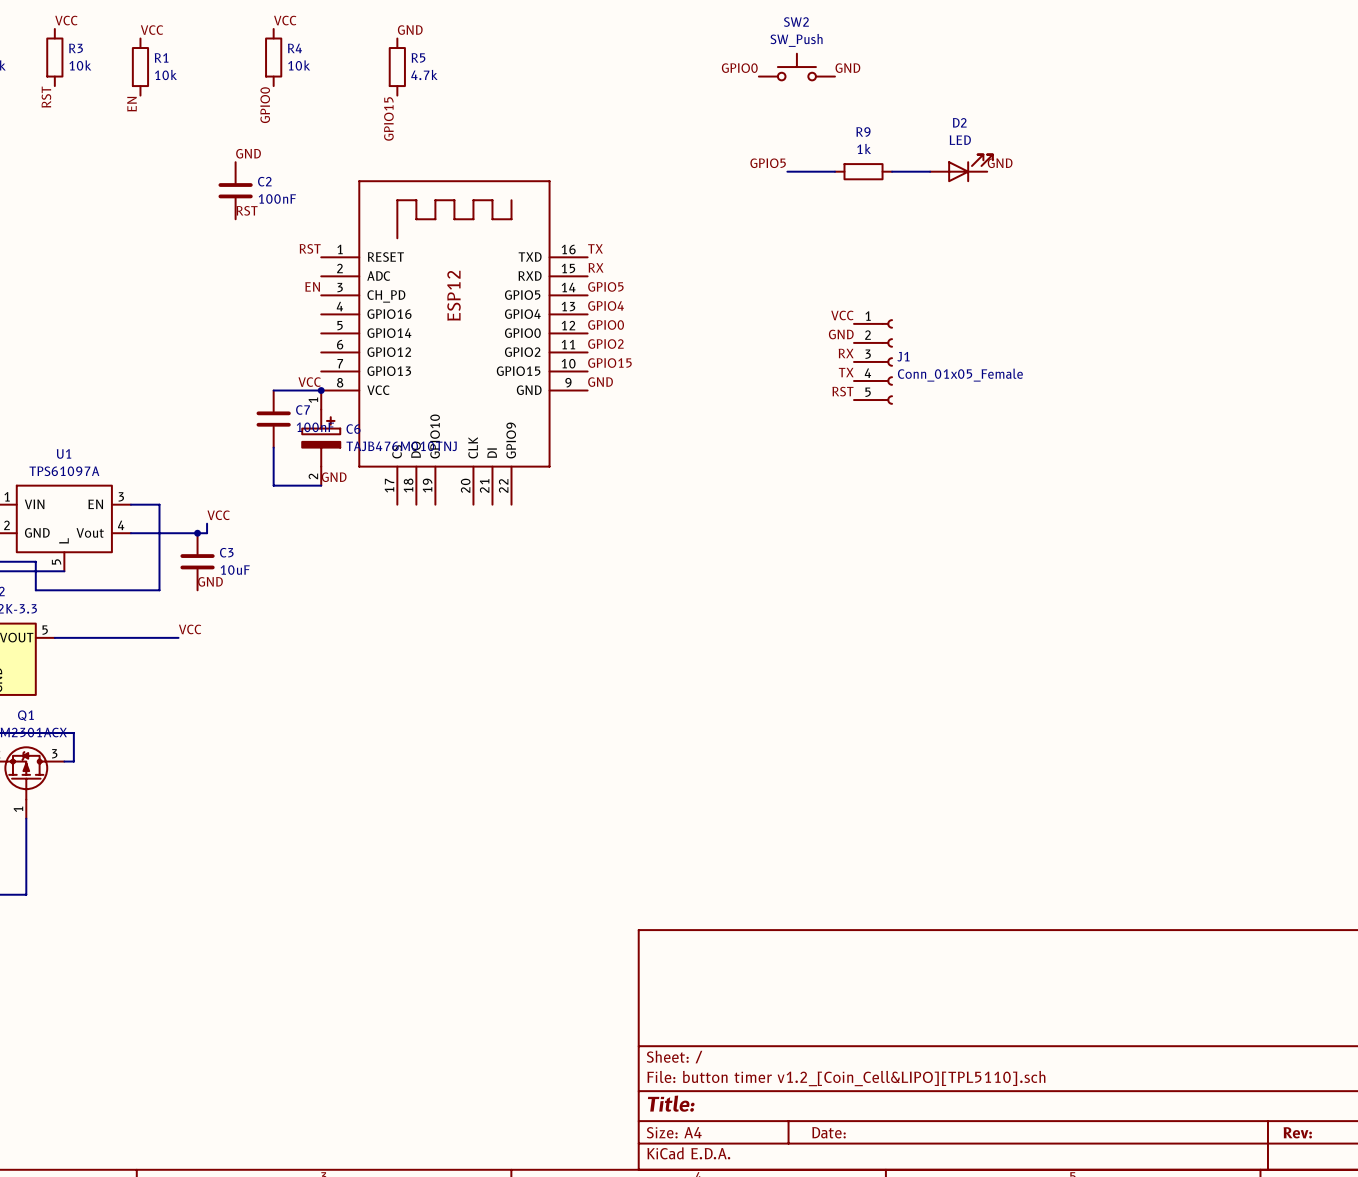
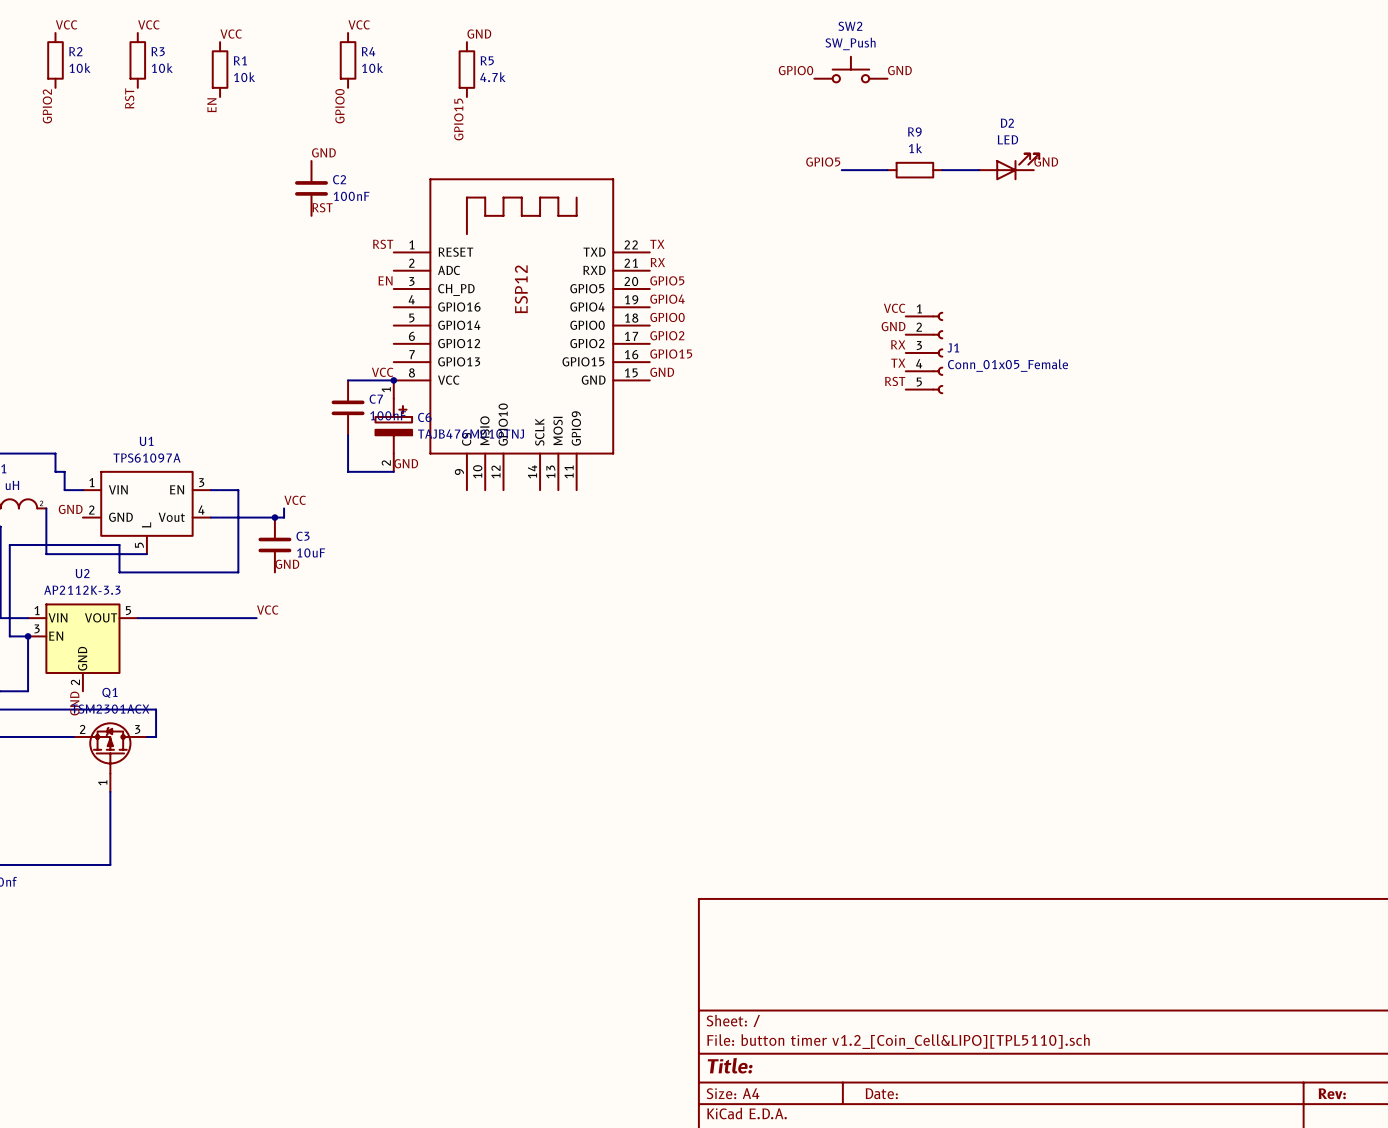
part symbol: [321, 181, 588, 505] -> [393, 179, 650, 491]

